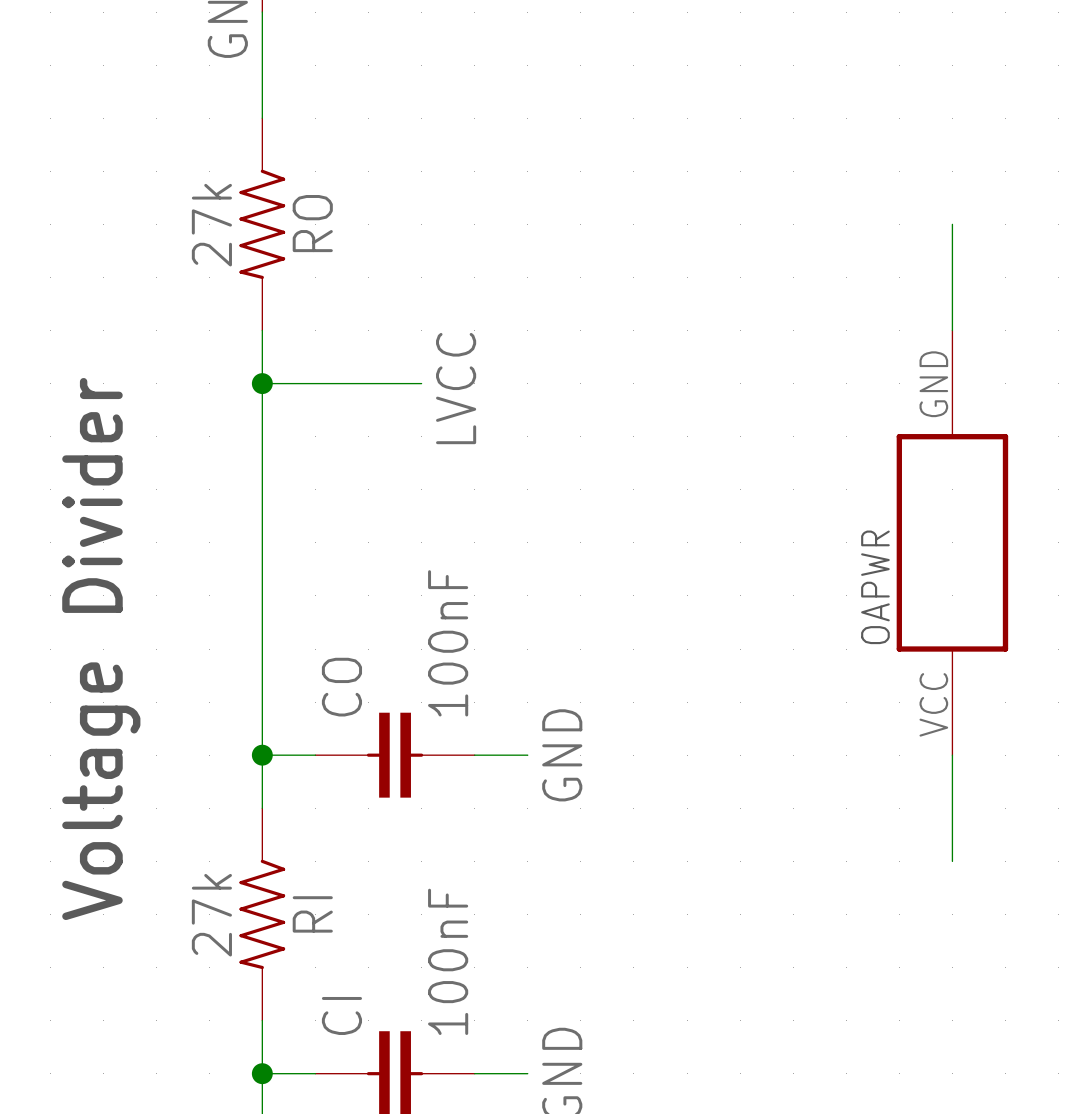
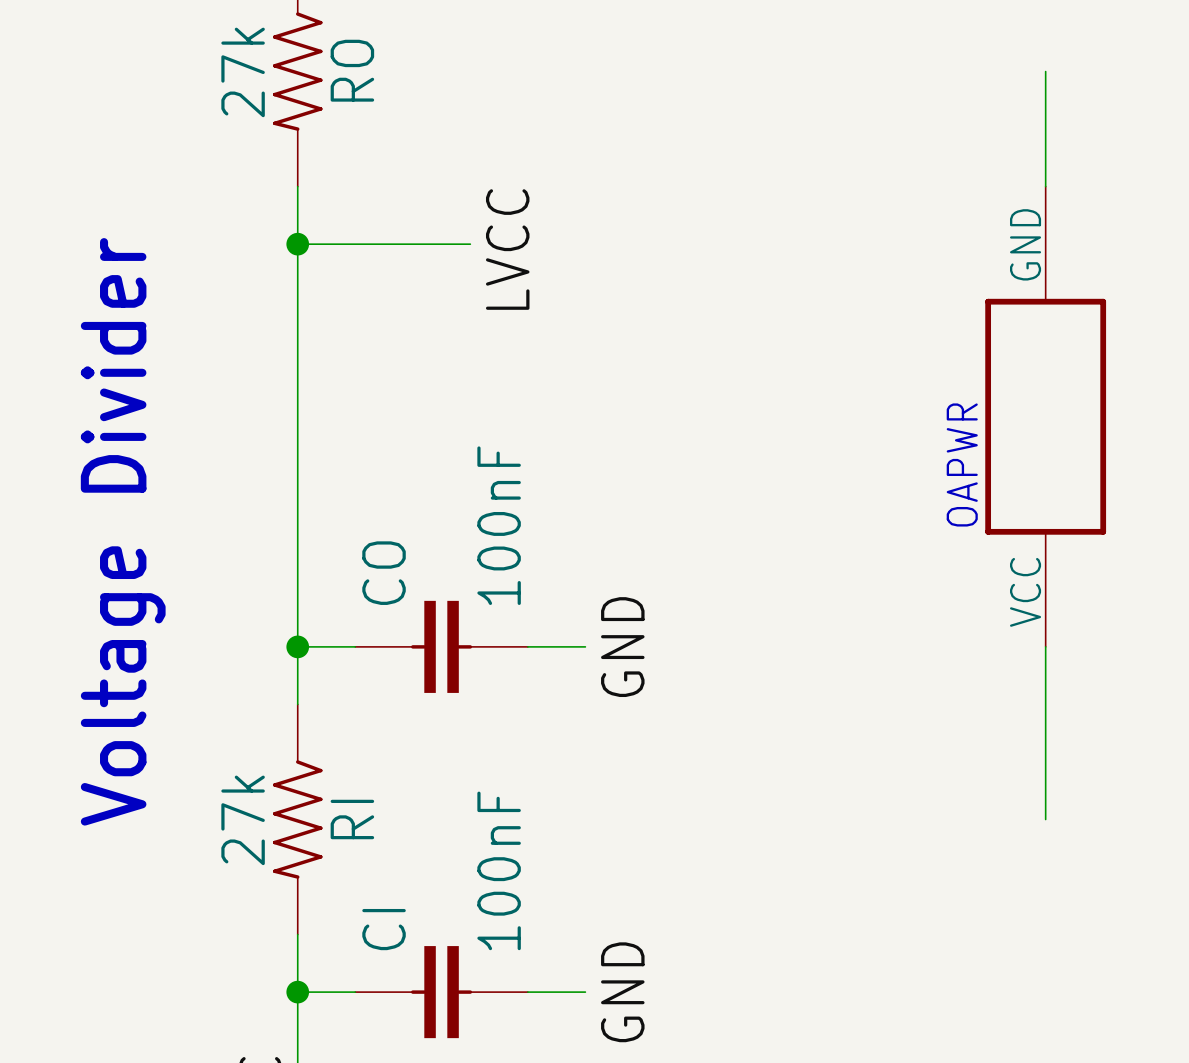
wire: none -> (1045, 761) (1045, 819)

